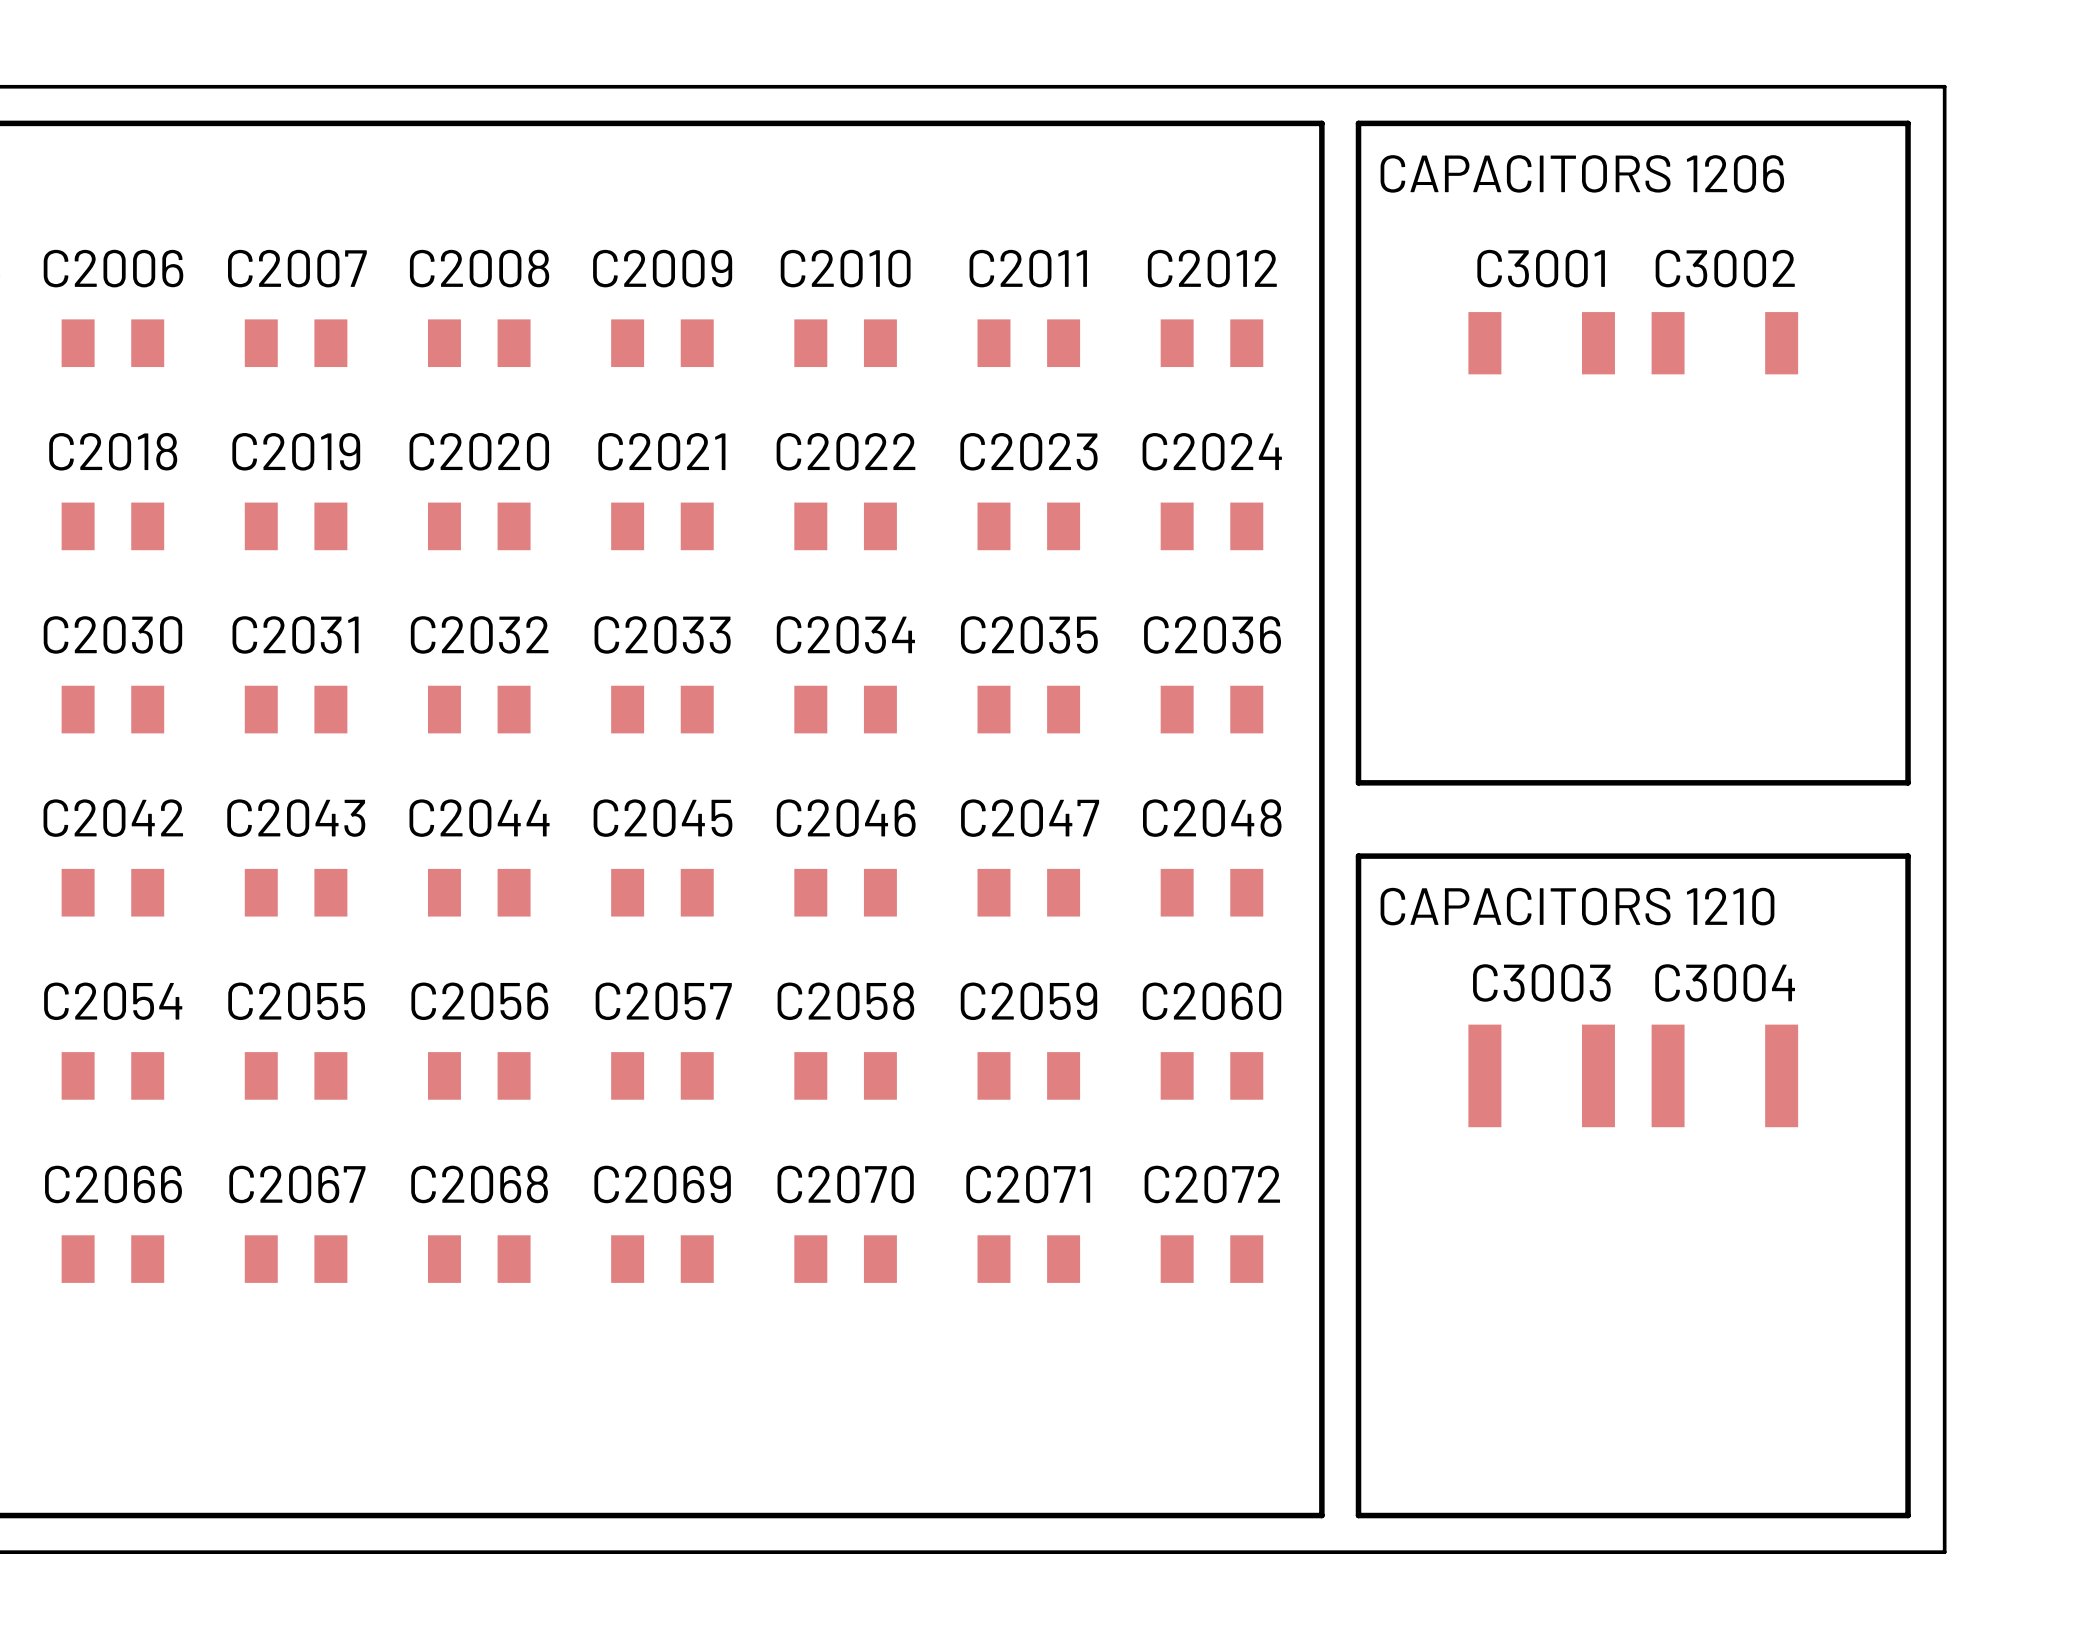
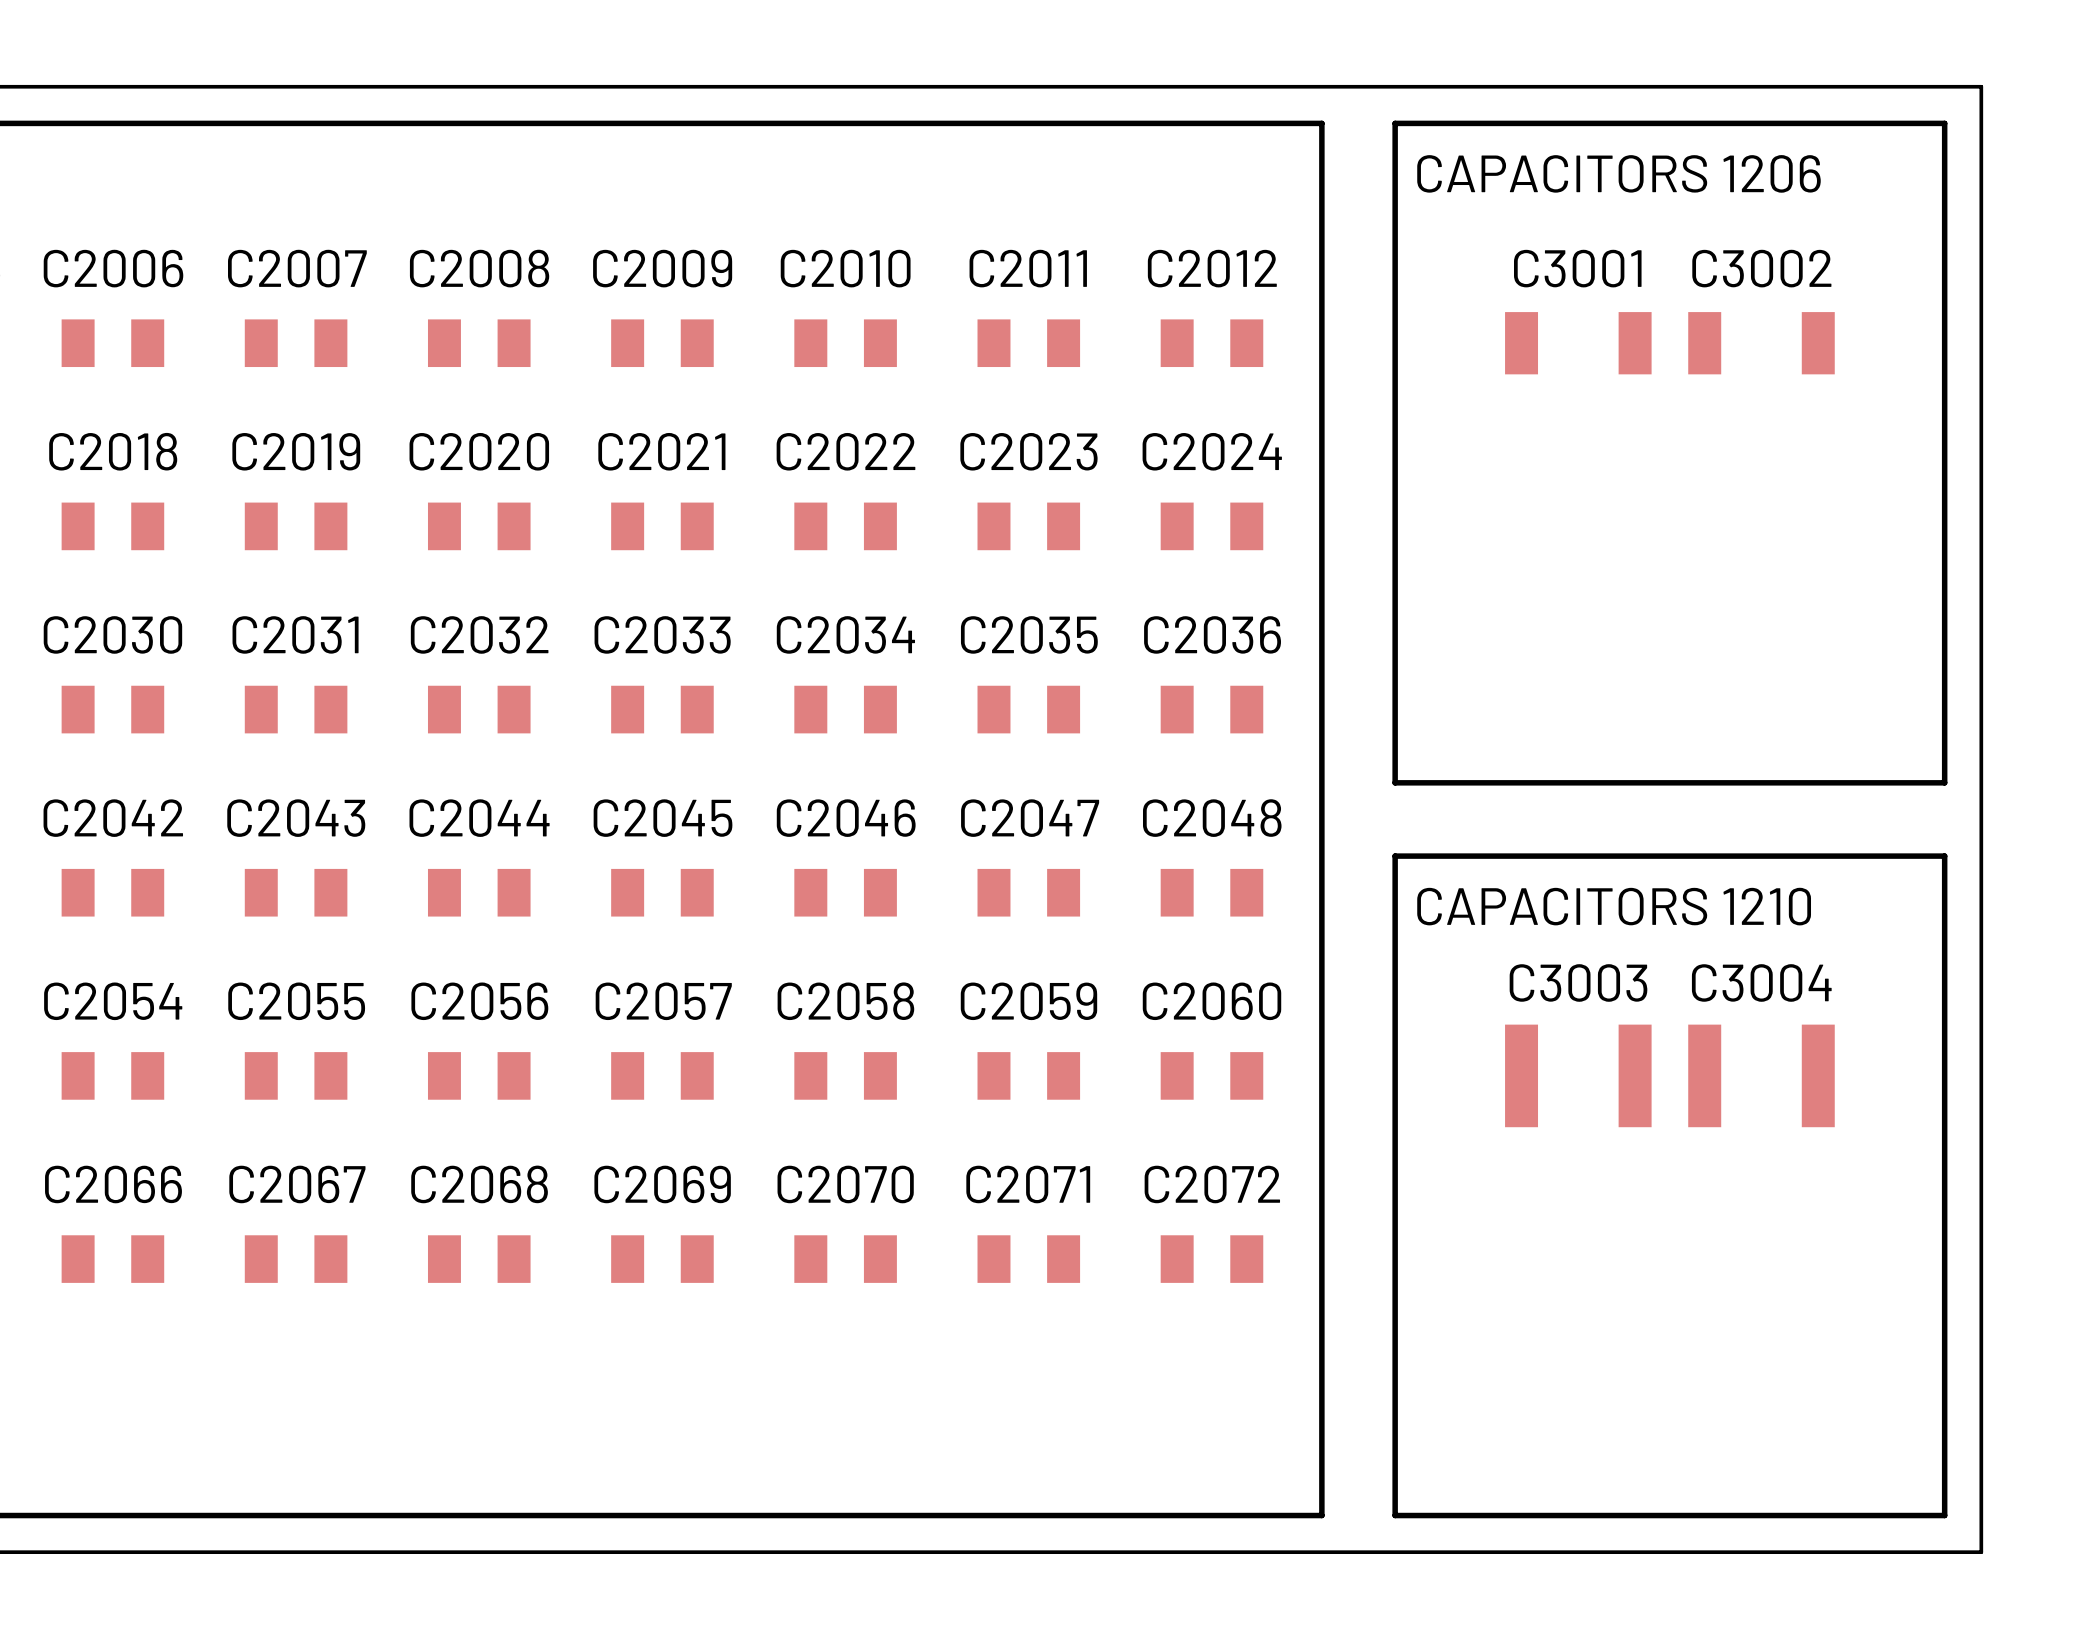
board edge: (1944, 86) (1944, 1552) -> (1944, 86) (1981, 86) (1981, 1552) (1944, 1552)
line: (1395, 123) (1358, 123) (1358, 782) (1395, 782) -> (1395, 123) (1395, 782)
line: (1908, 123) (1908, 782) -> (1908, 123) (1944, 123) (1944, 782) (1908, 782)
text position: CAPACITORS 1206 (1582, 173) -> CAPACITORS 1206 (1618, 173)
C3001 position: (1541, 343) -> (1578, 343)
C3002 position: (1724, 343) -> (1761, 343)
line: (1395, 856) (1358, 856) (1358, 1515) (1395, 1515) -> (1395, 856) (1395, 1515)
line: (1908, 856) (1908, 1515) -> (1908, 856) (1944, 856) (1944, 1515) (1908, 1515)
text position: CAPACITORS 1210 (1577, 906) -> CAPACITORS 1210 (1614, 906)
C3003 position: (1541, 1075) -> (1578, 1075)
C3004 position: (1724, 1075) -> (1761, 1075)

